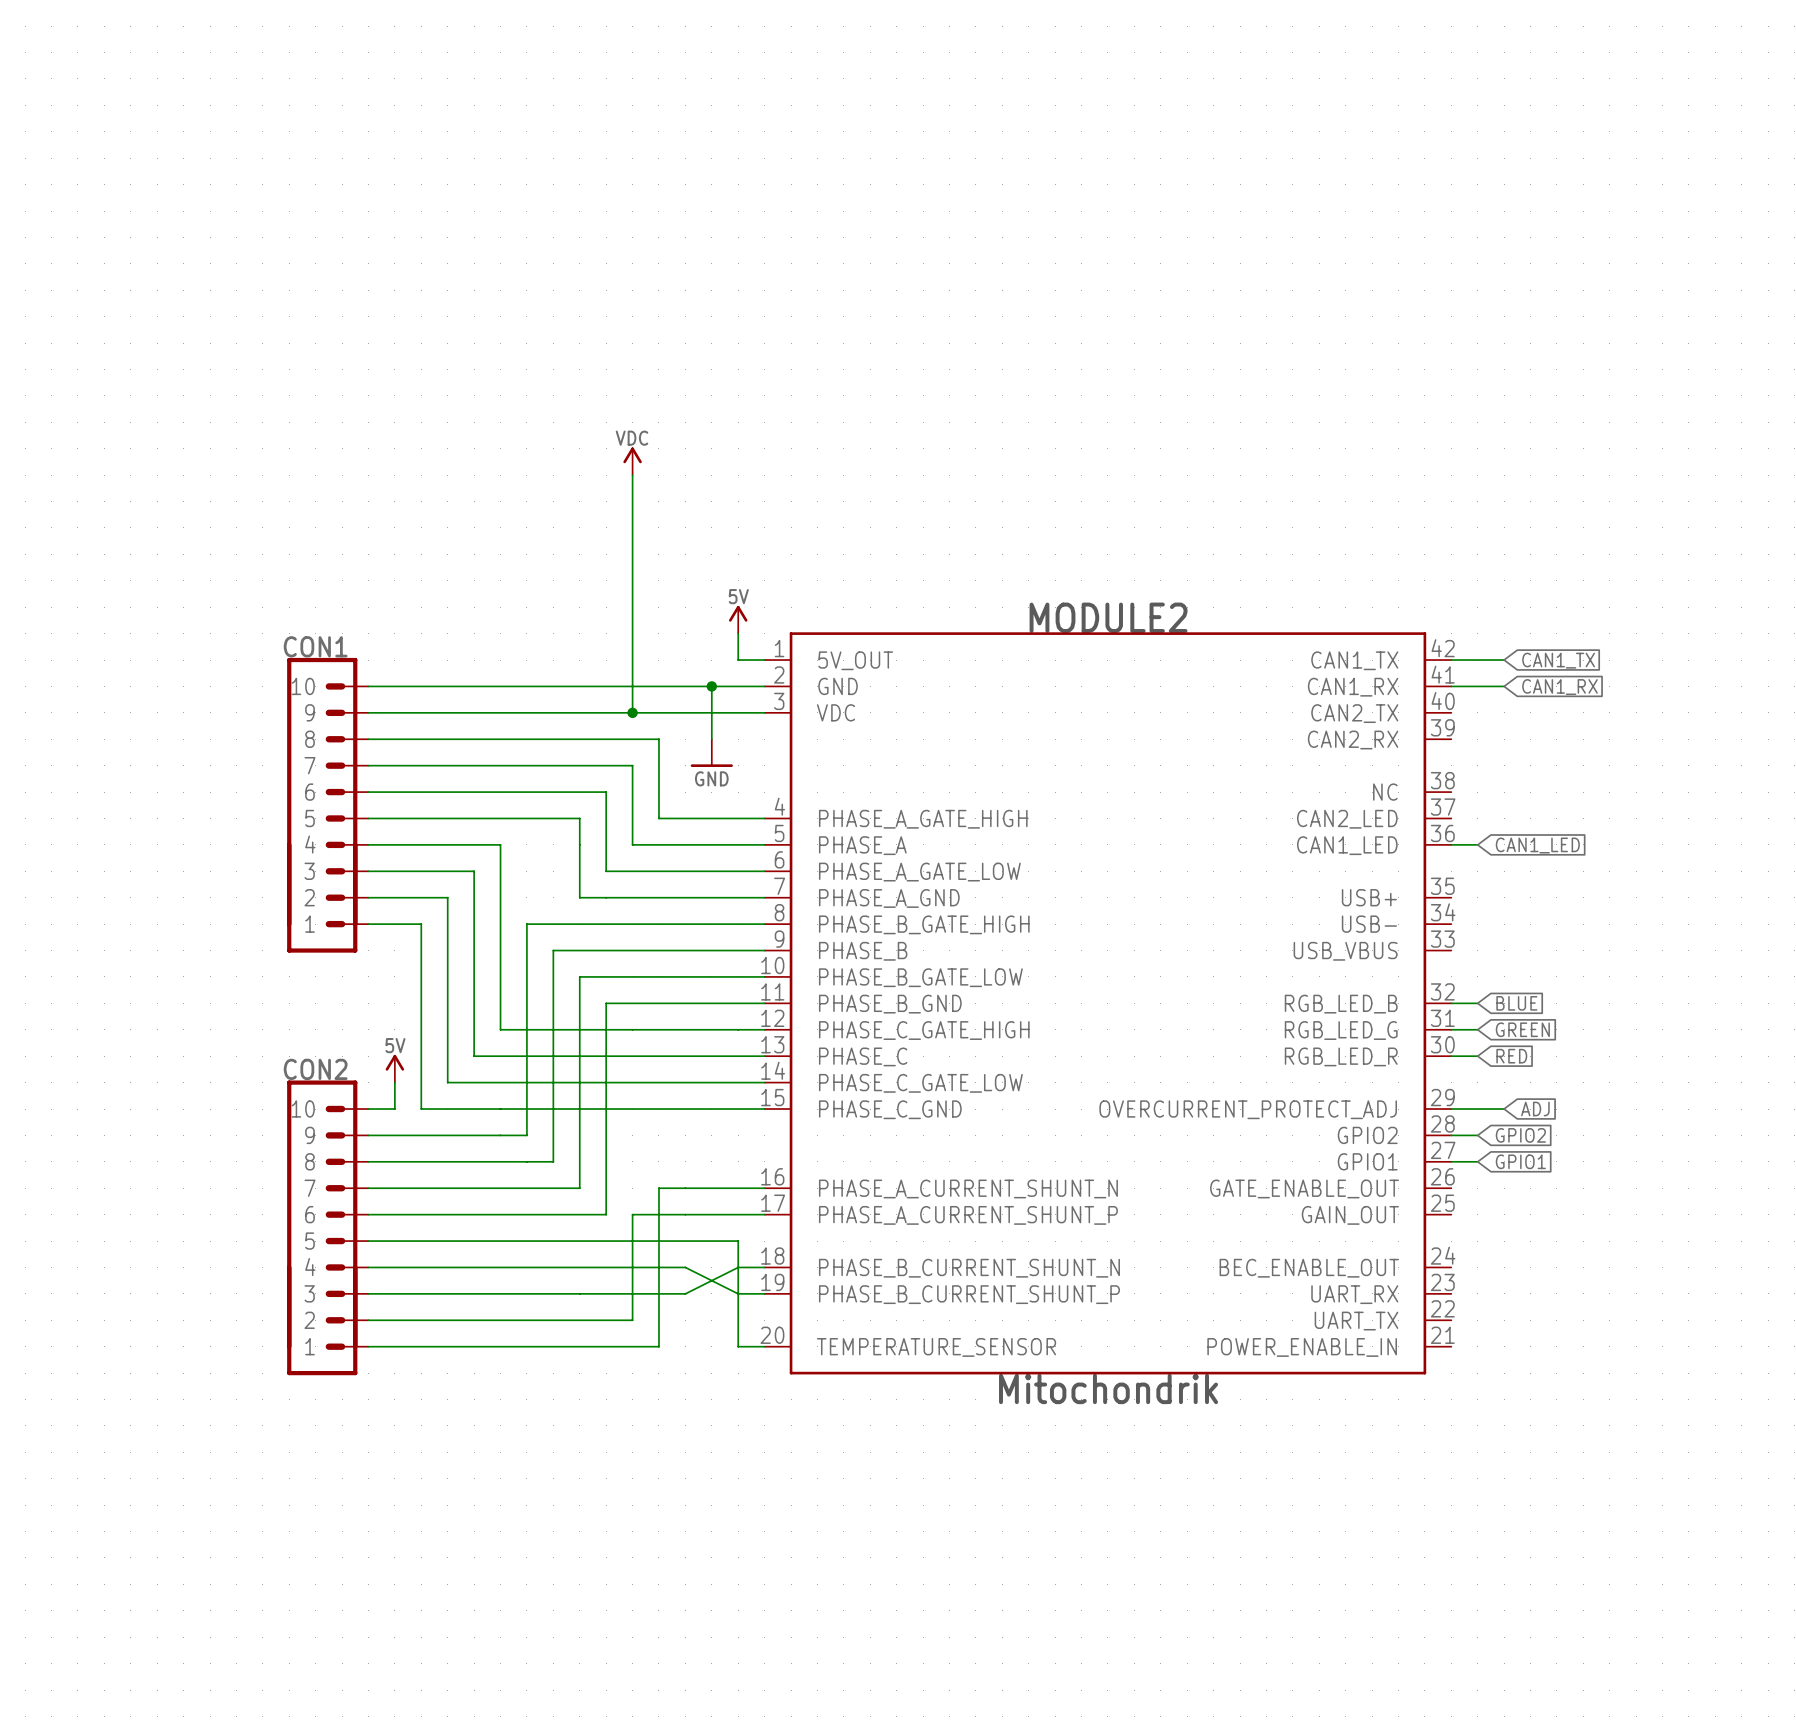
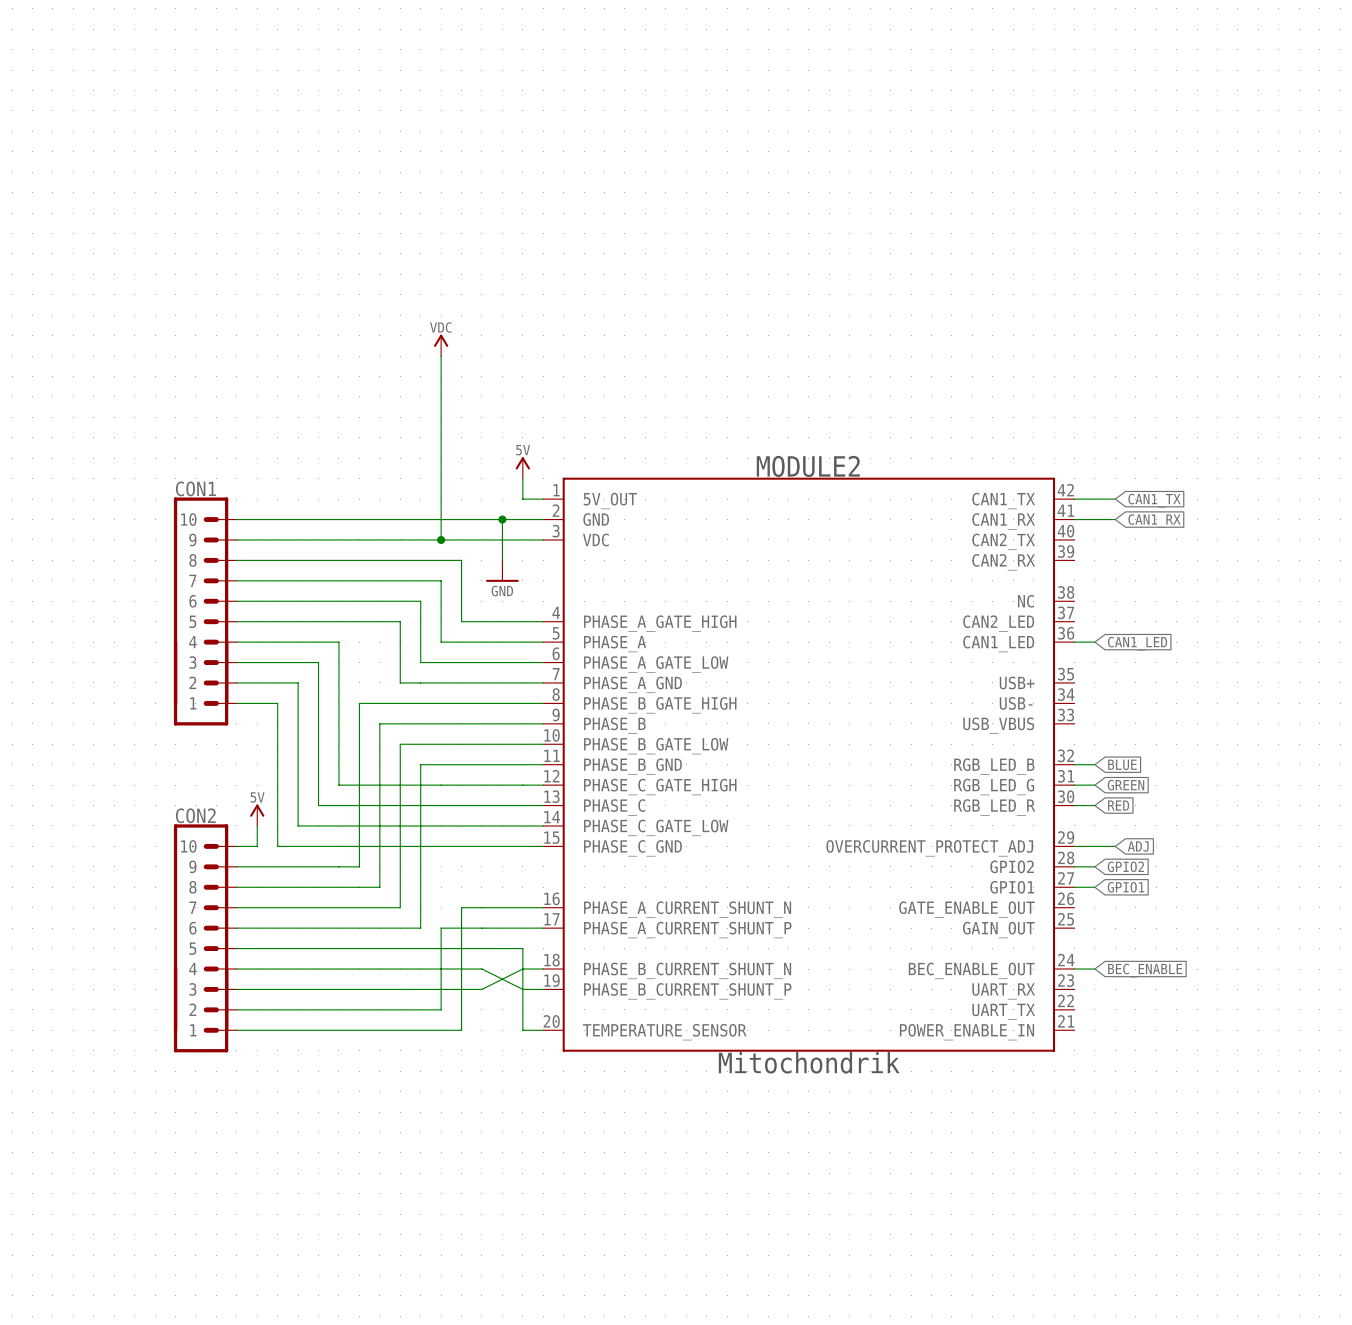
wire: none -> (1074, 969) (1094, 969)
global label: none -> BEC_ENABLE (1145, 970)

